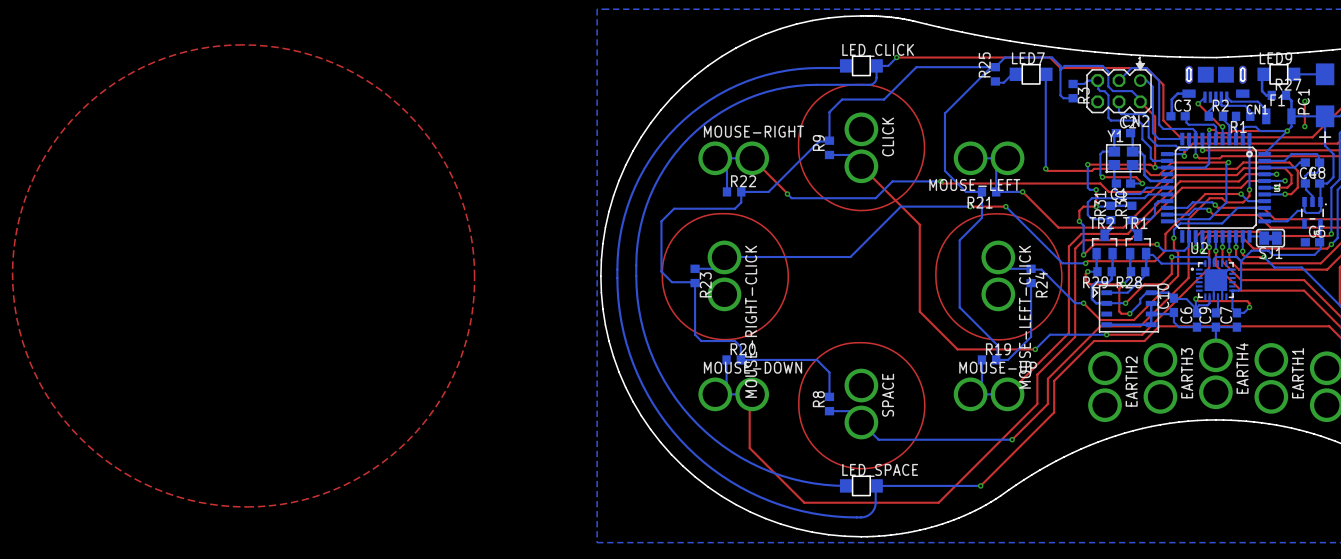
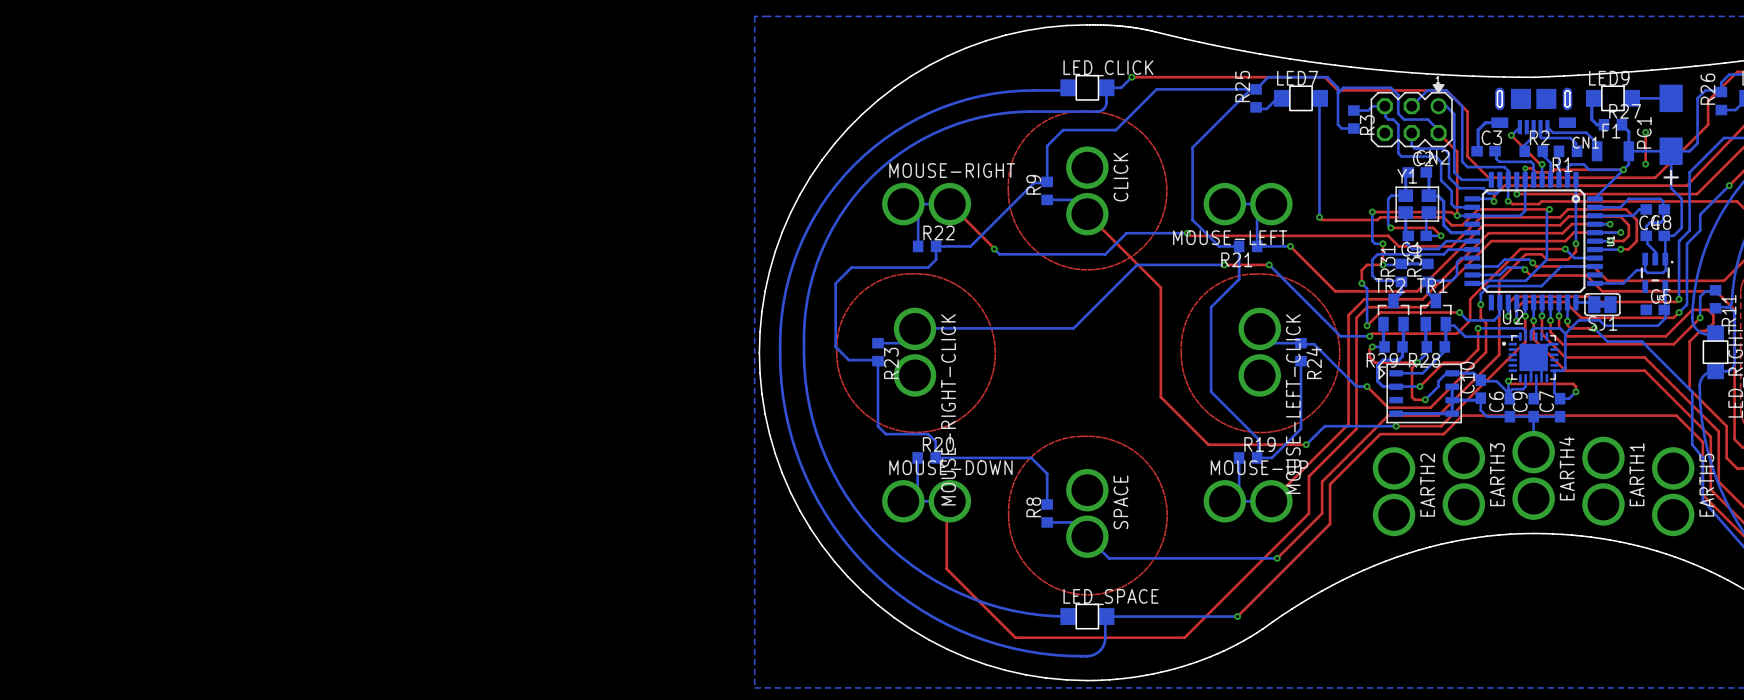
top zone outline: (243, 44) (288, 49) (331, 62) (371, 83) (406, 112) (435, 147) (456, 187) (470, 230) (474, 275) (470, 324) (457, 366) (436, 406) (408, 440) (373, 468) (334, 489) (292, 502) (247, 506) (200, 502) (156, 489) (116, 467) (80, 438) (51, 403) (30, 363) (17, 319) (12, 273) (16, 229) (29, 186) (51, 146) (79, 111) (114, 83) (153, 62) (196, 49) (243, 44) -> none
CN1 footprint: [1182, 65, 1250, 103] -> [1491, 87, 1576, 135]

